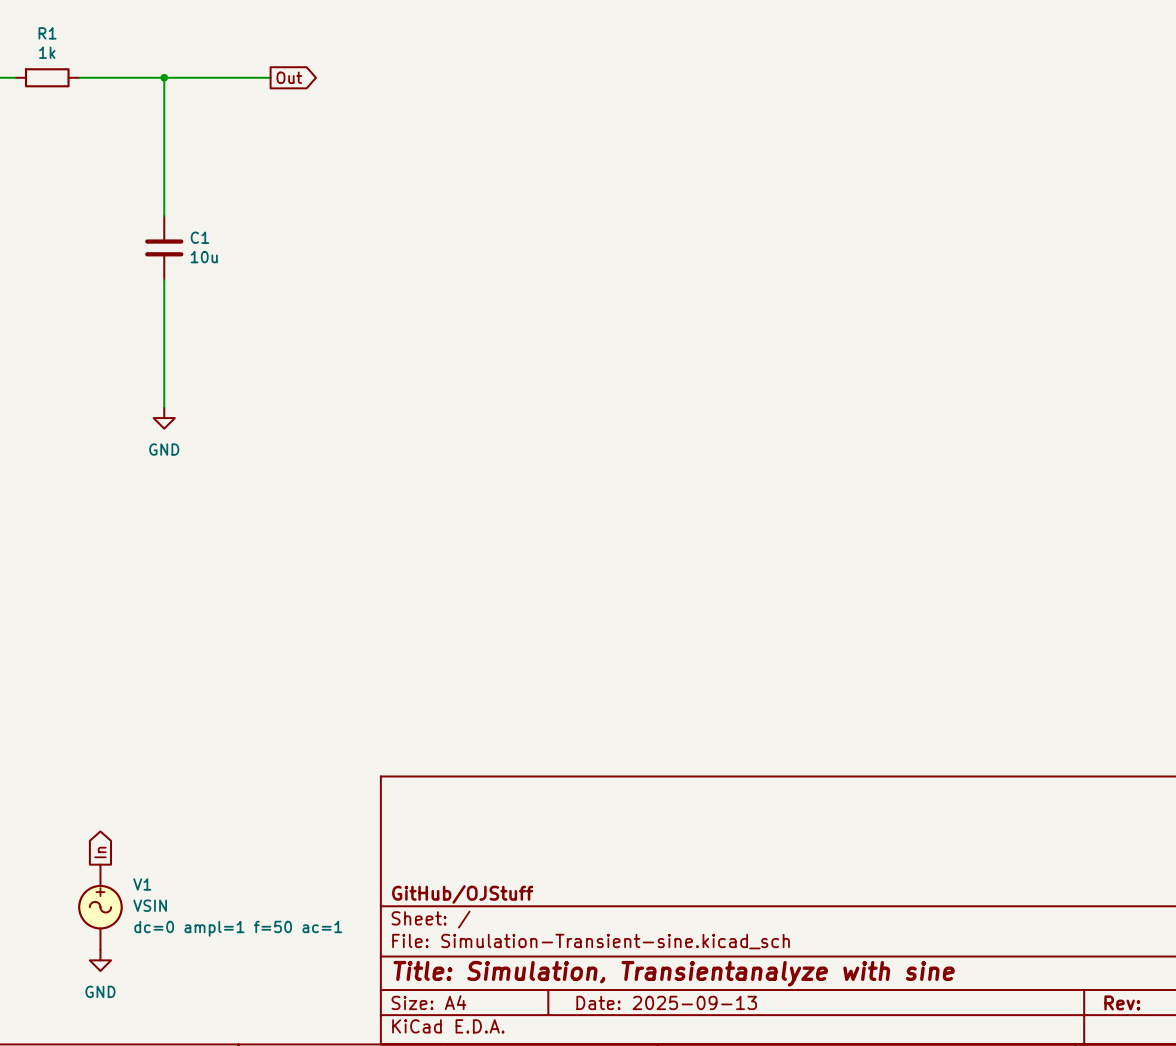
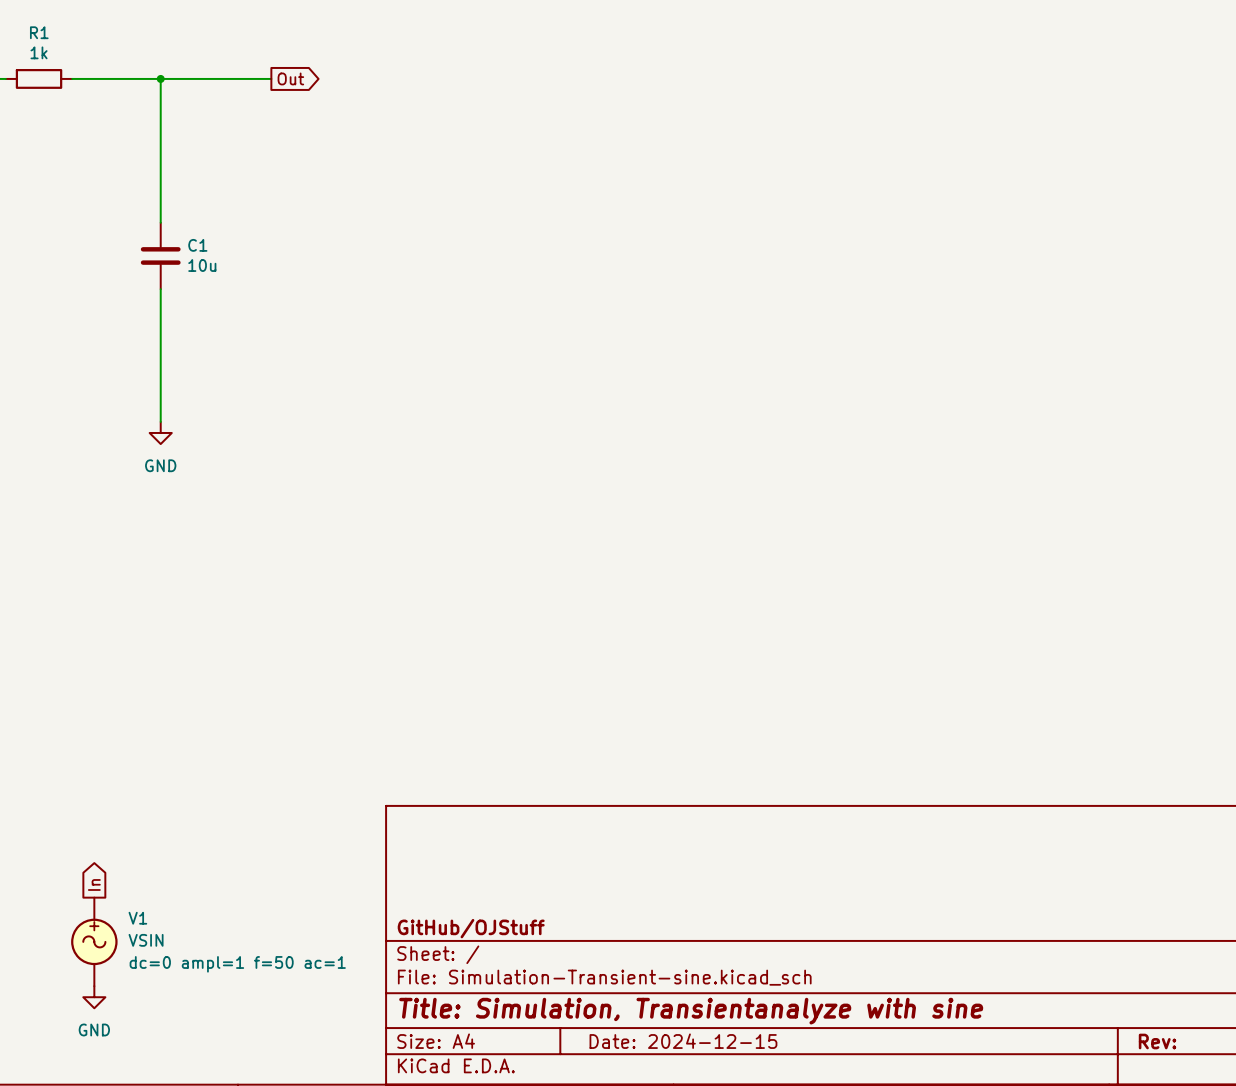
title block: Date: 2025-09-13 (666, 1002) -> Date: 2024-12-15 (683, 1041)

